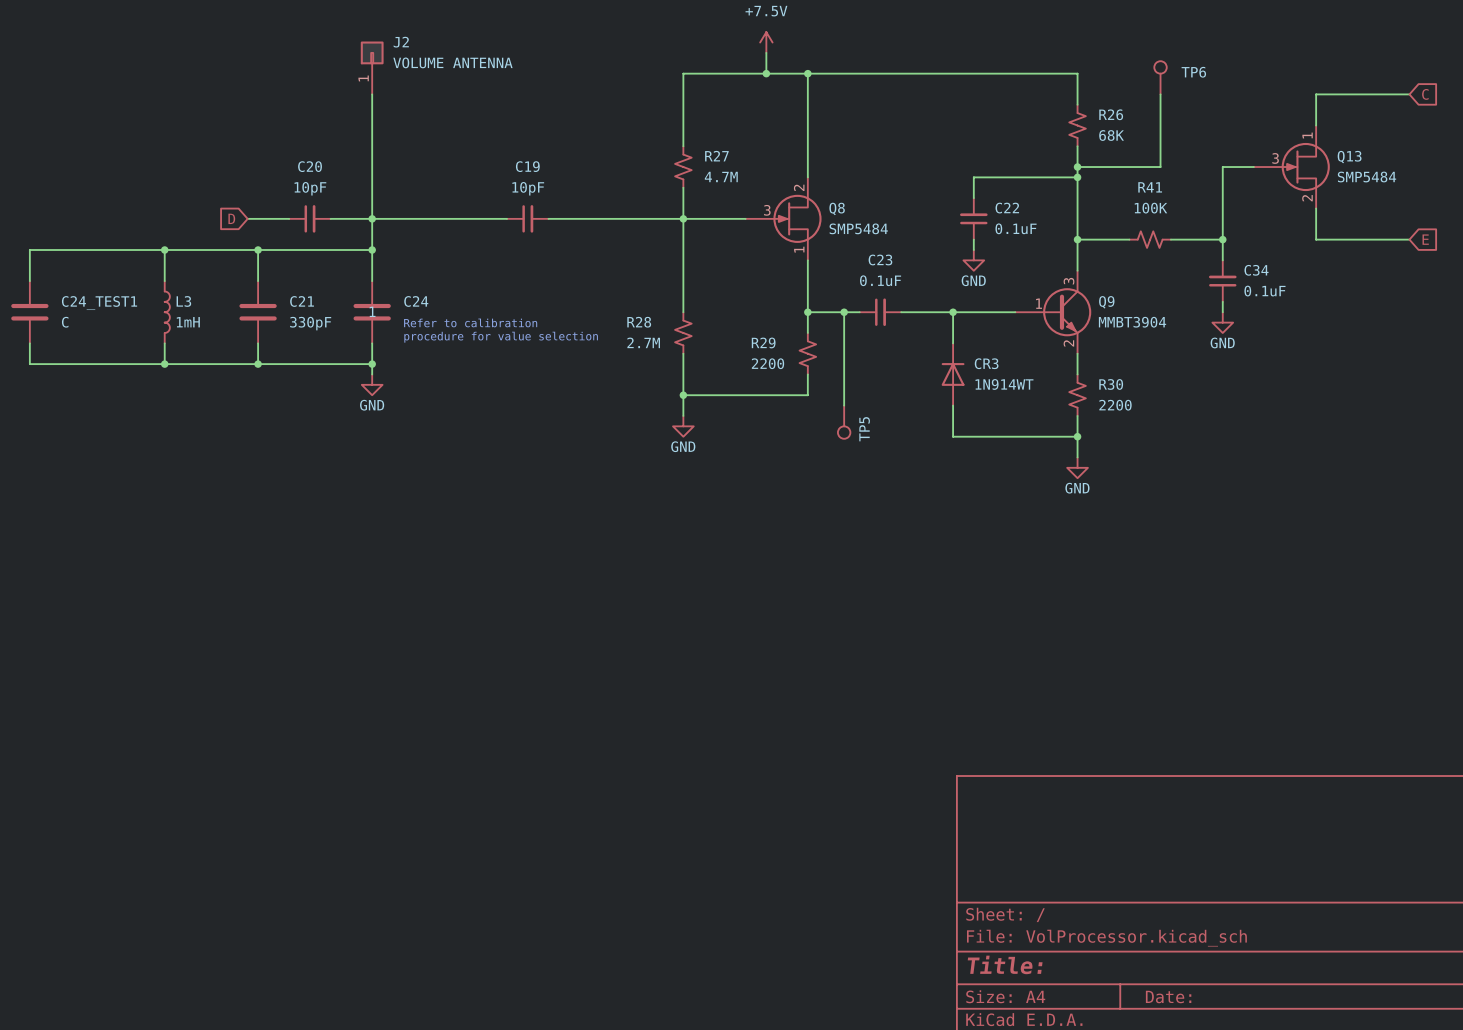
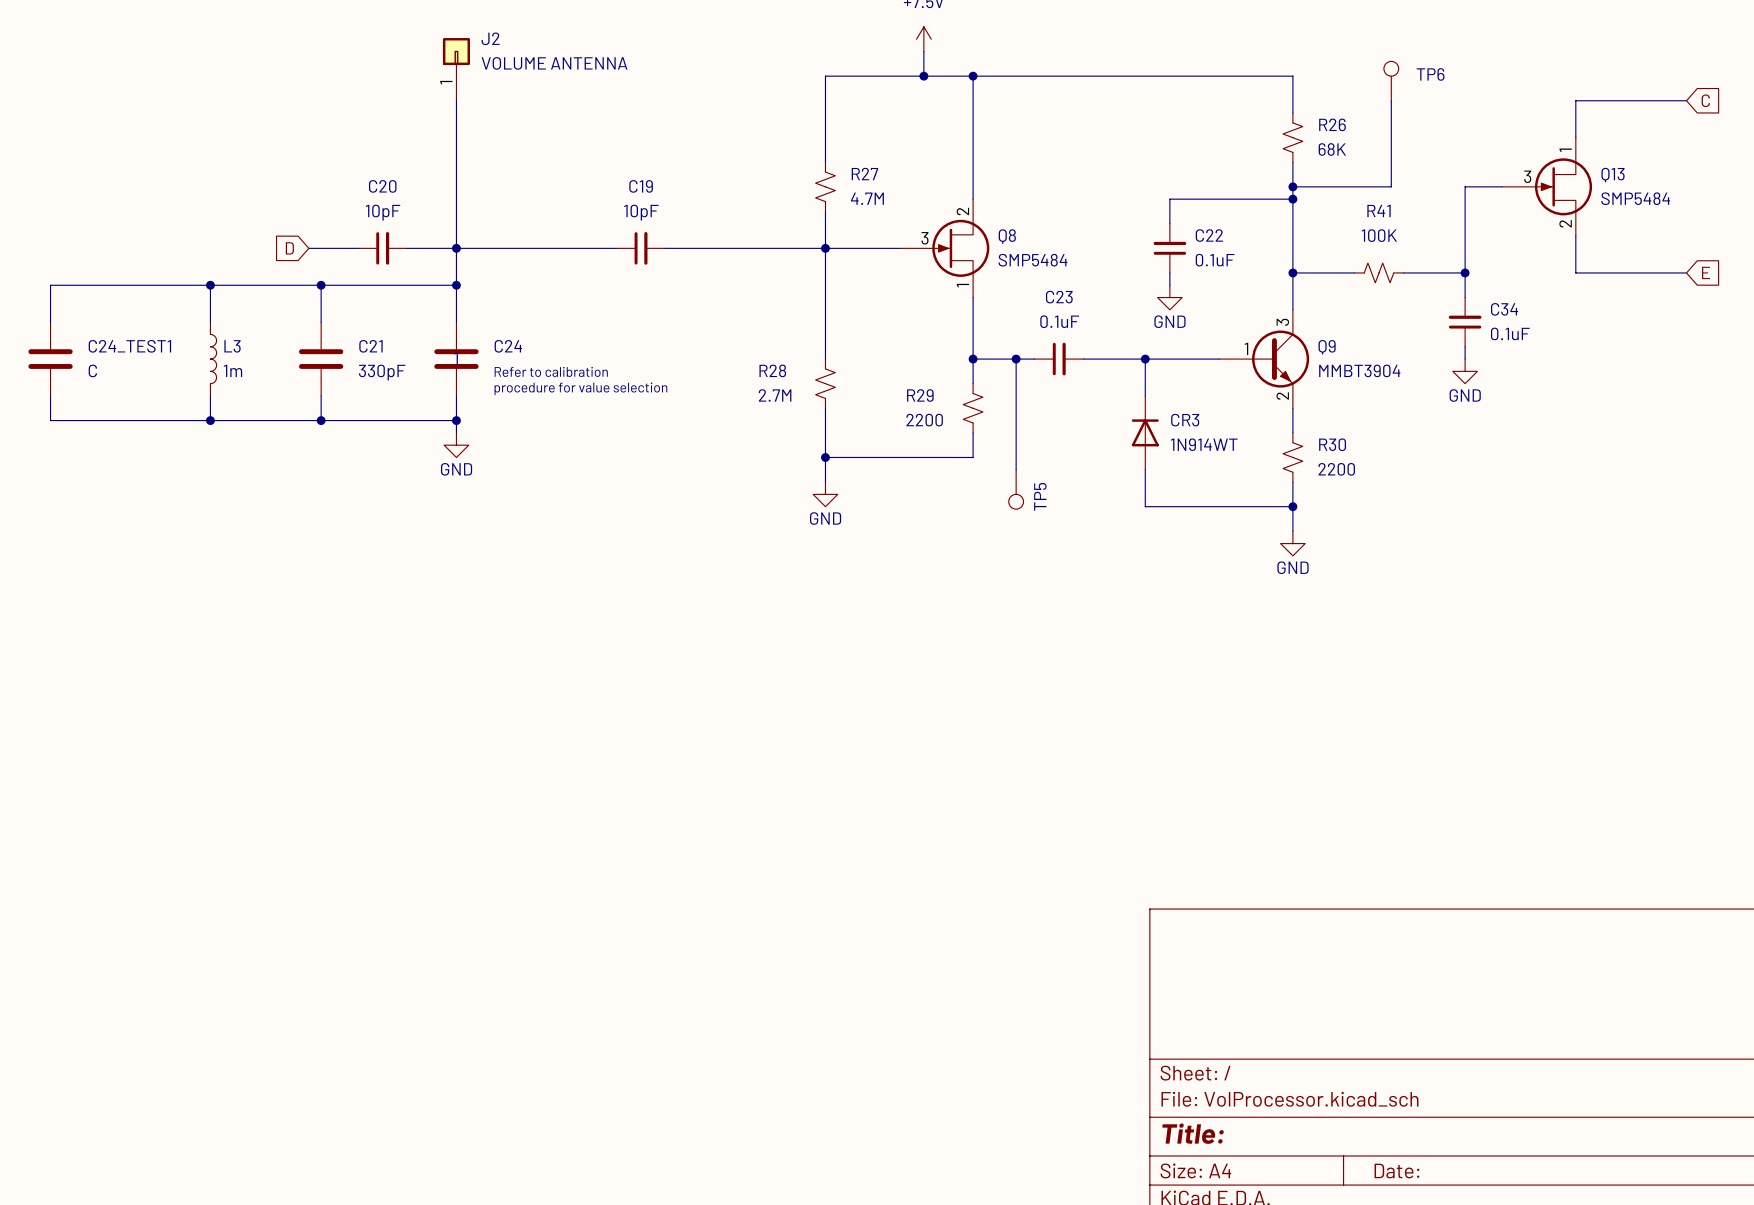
L3 value: 1mH (188, 322) -> 1m (232, 370)

